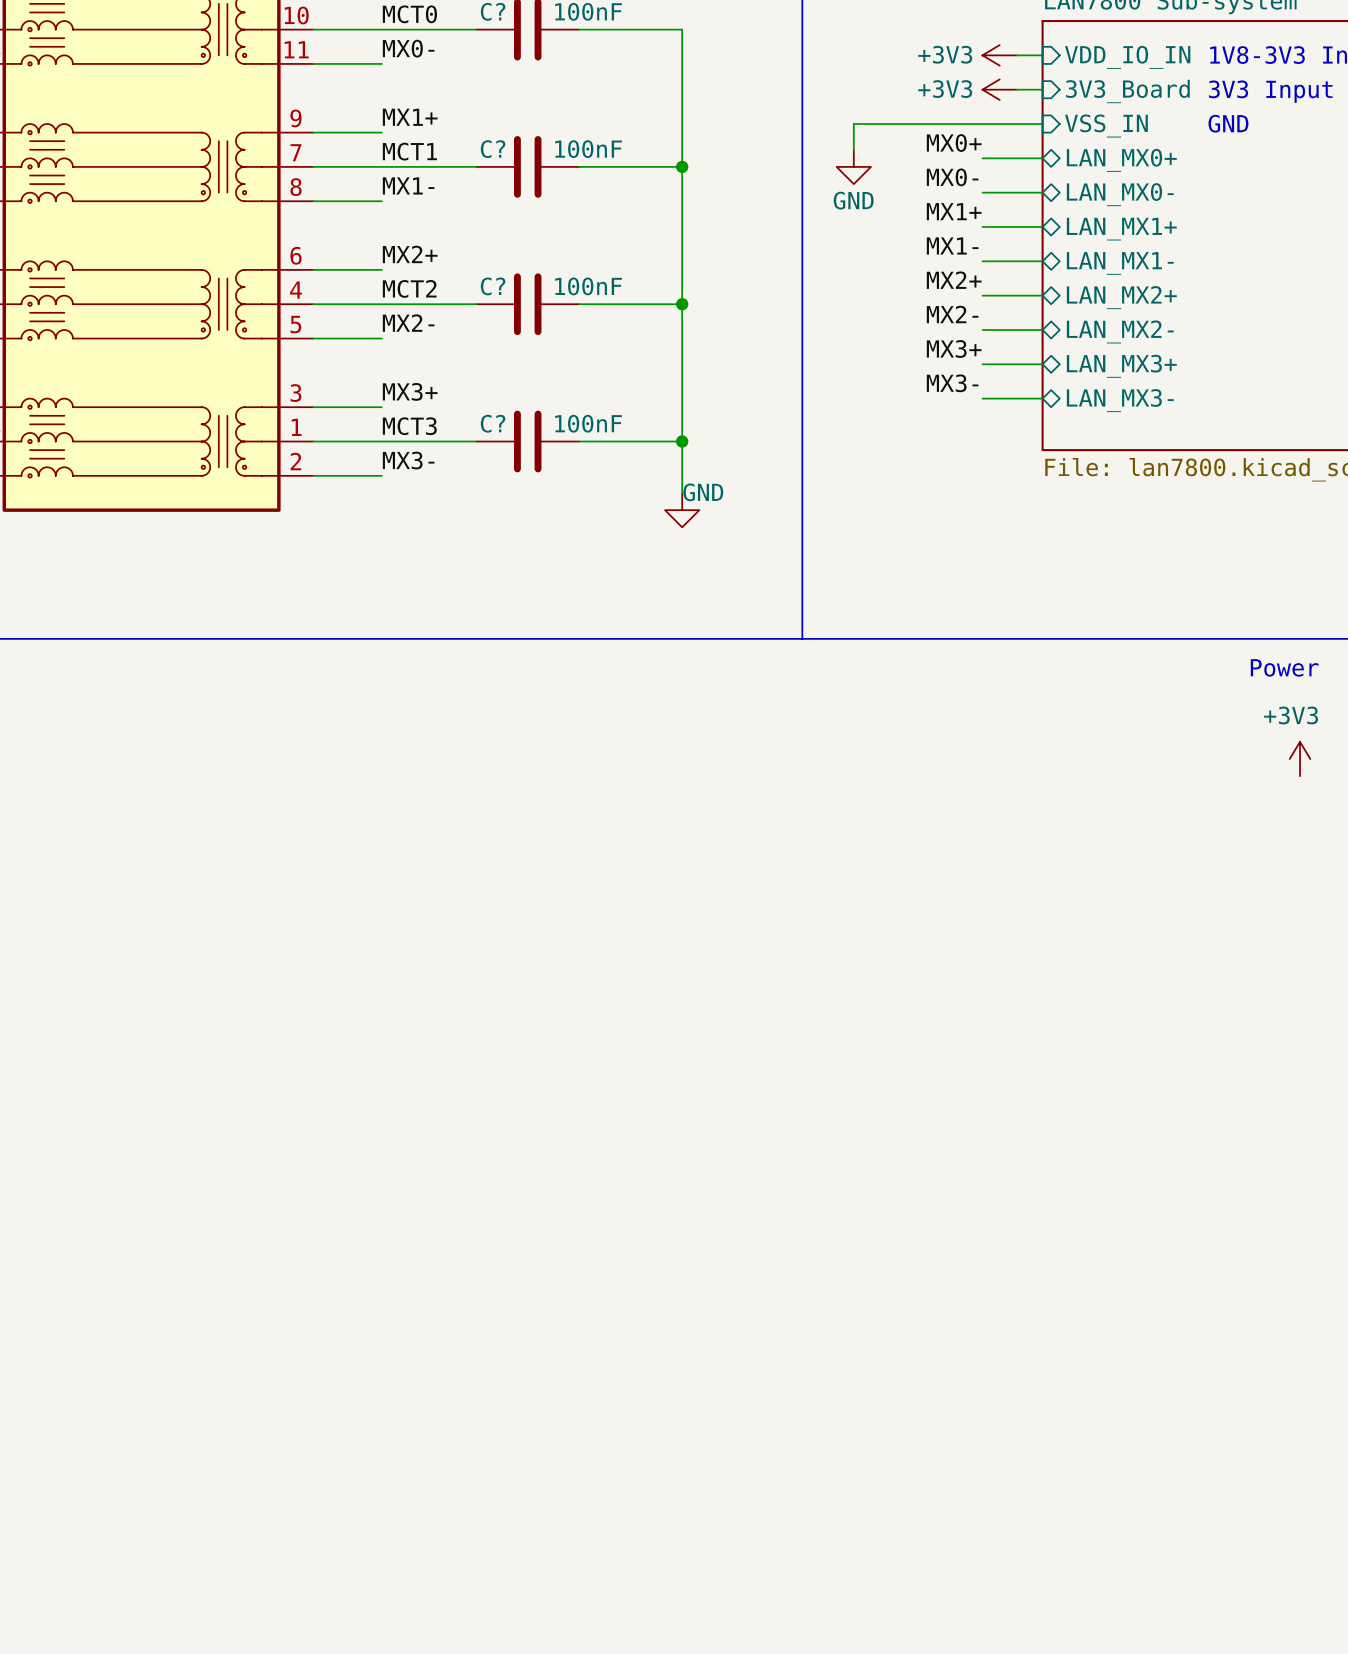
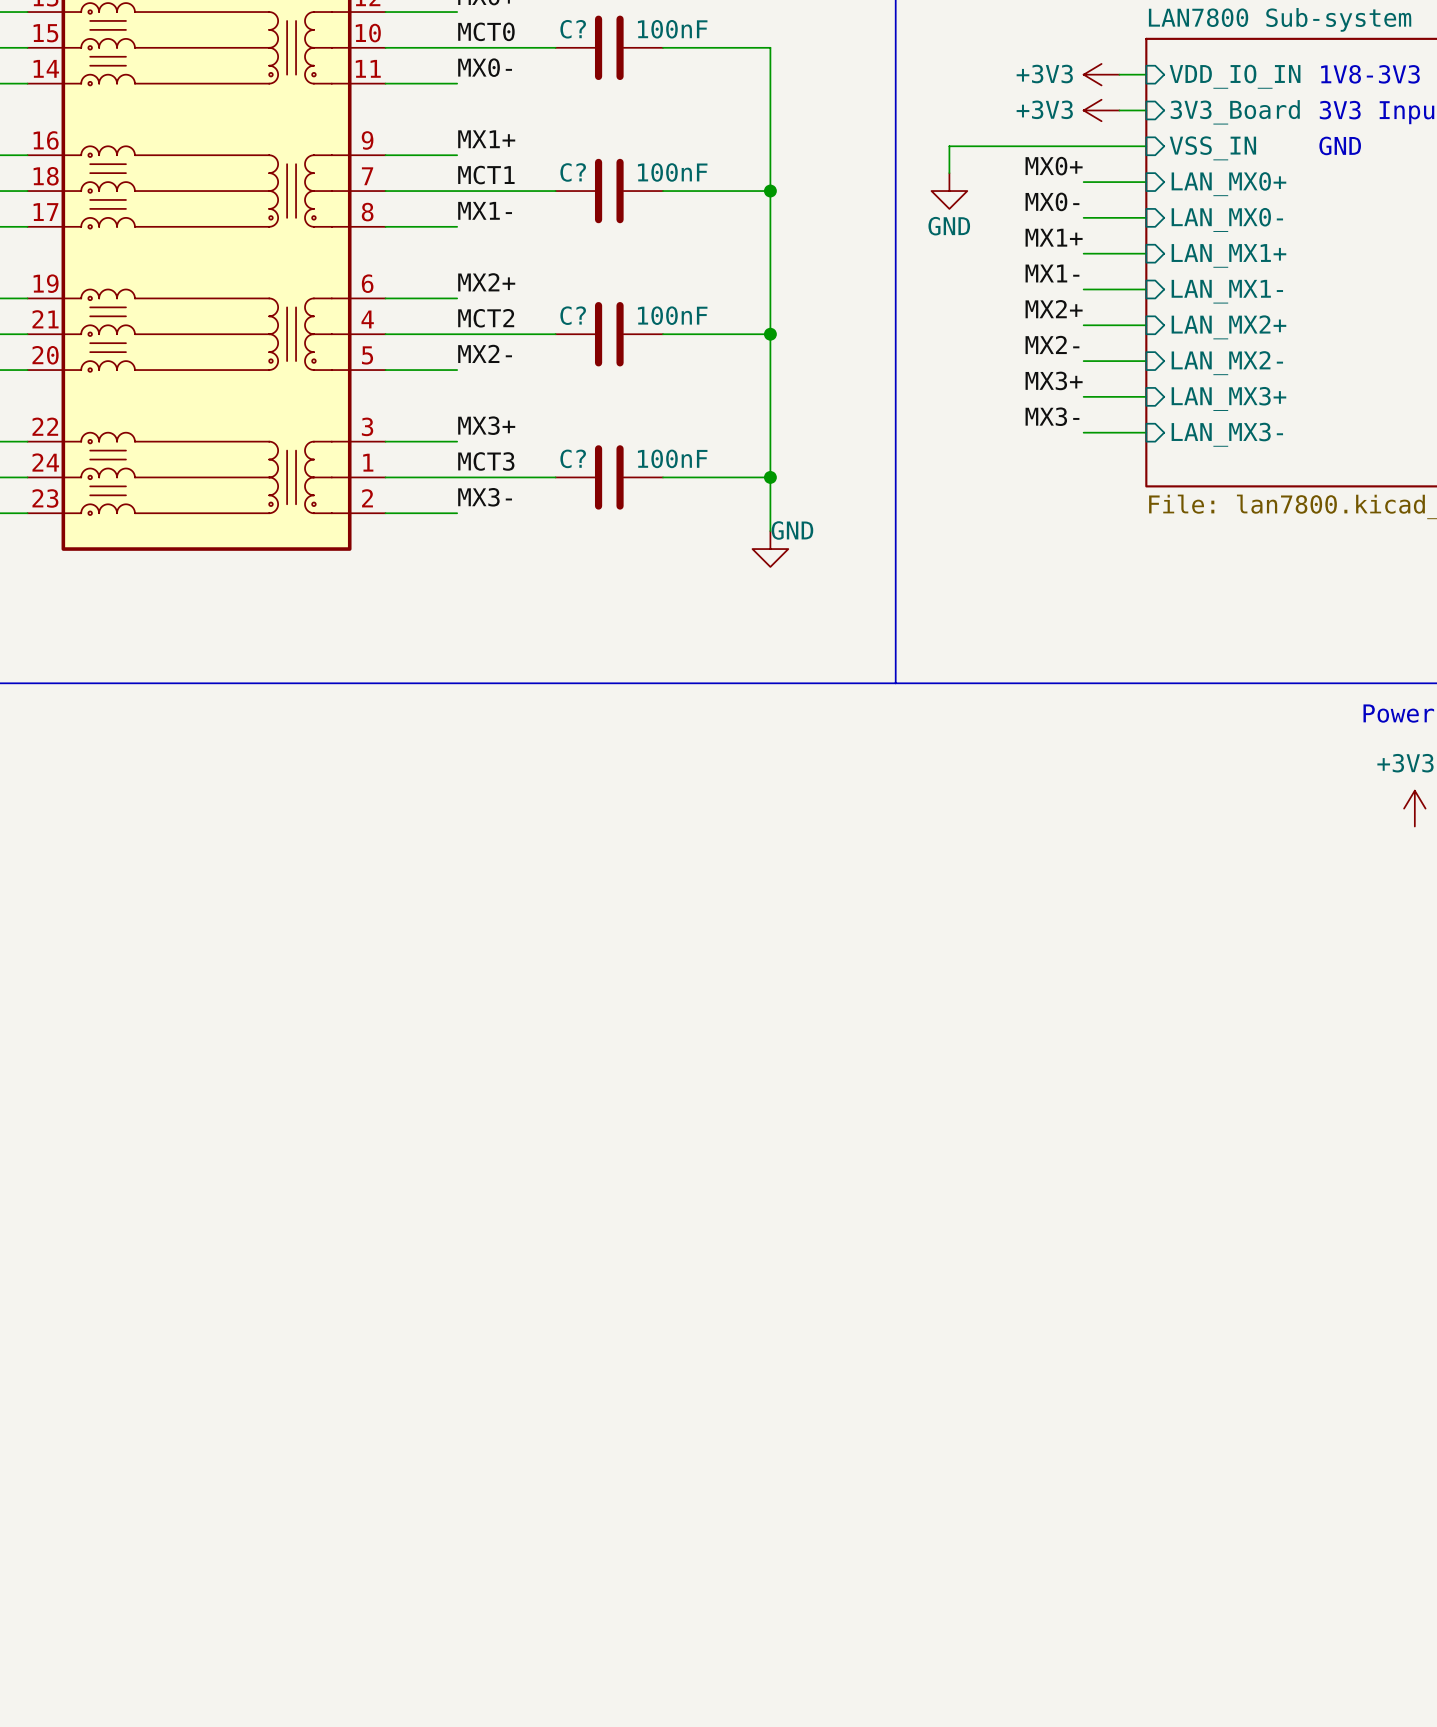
sheet pin shape: bidirectional (1121, 160) -> input (1228, 184)
sheet pin shape: bidirectional (1120, 194) -> input (1227, 219)
sheet pin shape: bidirectional (1121, 229) -> input (1228, 255)
sheet pin shape: bidirectional (1120, 263) -> input (1227, 291)
sheet pin shape: bidirectional (1121, 297) -> input (1228, 327)
sheet pin shape: bidirectional (1120, 331) -> input (1227, 363)
sheet pin shape: bidirectional (1121, 366) -> input (1228, 398)
sheet pin shape: bidirectional (1120, 400) -> input (1227, 434)

